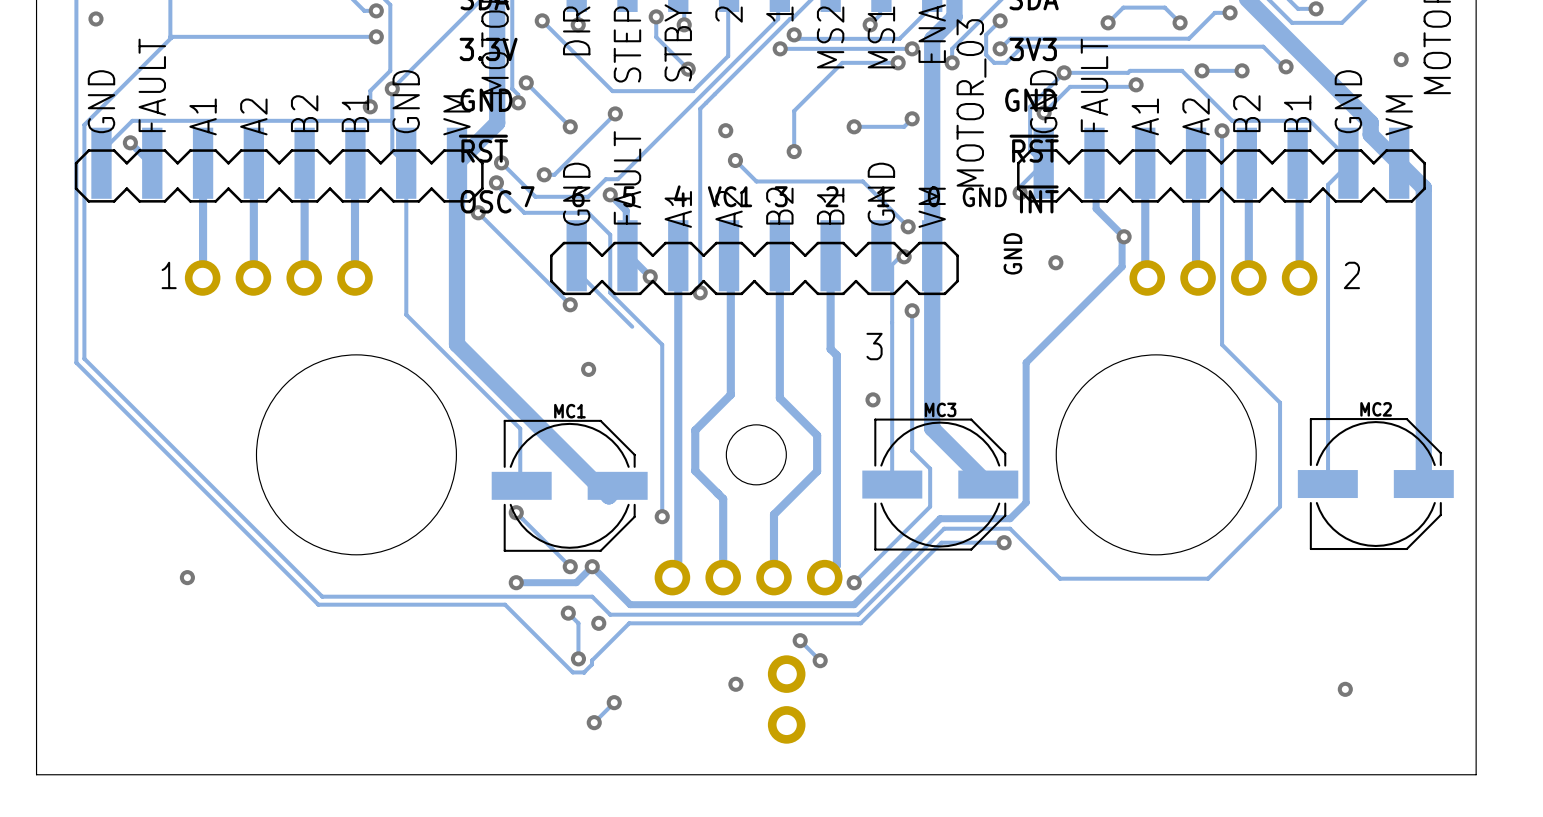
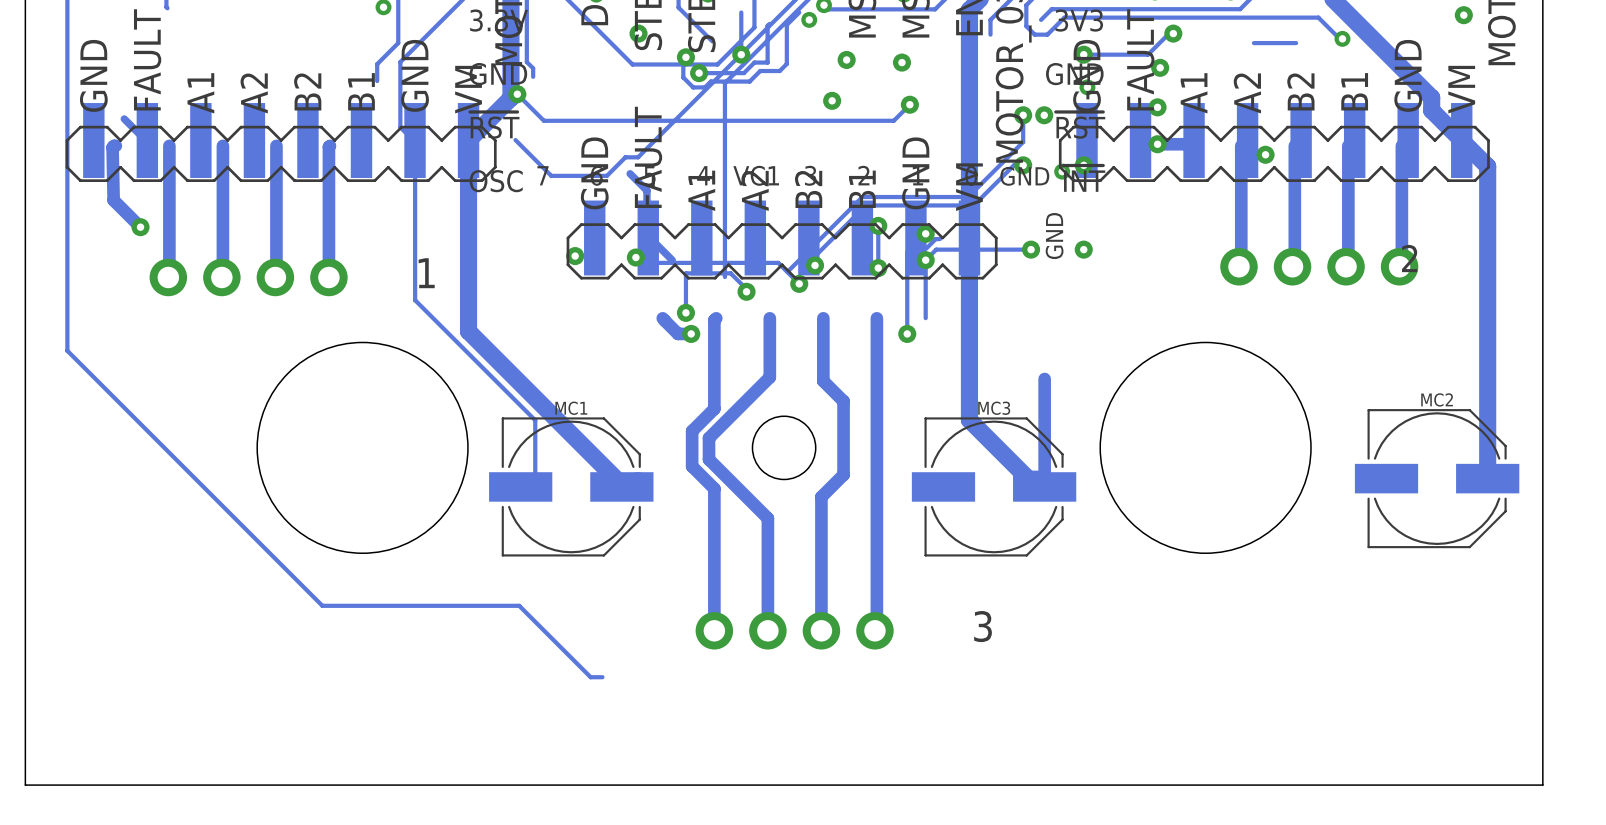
track: (376, 36) (172, 36) (84, 124) (84, 358) (322, 596) (592, 596) (610, 614) (858, 614) (944, 528) (1010, 528) (1060, 578) (1208, 578) (1280, 506) (1280, 402) (1222, 344) (1222, 130) -> none
track: none -> (741, 12) (741, 54)
track: none -> (799, 12) (786, 24) (786, 63) (779, 71) (760, 71) (749, 81) (710, 81) (705, 87) (693, 87) (683, 77) (683, 57) (685, 57)
track: (912, 48) (780, 48) -> none
via: (912, 48) -> none
via: (1000, 48) -> none
track: none -> (769, 23) (767, 25) (767, 62) (754, 62) (743, 73) (699, 73)
via position: (1401, 59) -> (1463, 15)
via: none -> (638, 33)
track: none -> (1173, 33) (1171, 31) (1148, 54) (1083, 54)
via: none -> (1173, 33)
track: (898, 62) (842, 62) (794, 110) (794, 151) -> none
via: (898, 62) -> none
via: (952, 62) -> none
via: (688, 69) -> none
via: (1202, 70) -> none
via: (1242, 70) -> none
via: (1064, 72) -> none
via: none -> (741, 54)
via: none -> (1083, 54)
track: (526, 82) (570, 126) -> none
via: (526, 82) -> none
via: none -> (685, 57)
track: (1136, 84) (1134, 86) (1070, 86) (1044, 112) -> none
via: (1136, 84) -> none
via: none -> (846, 59)
via: (392, 88) -> none
via: none -> (901, 62)
via: none -> (1160, 67)
via: none -> (699, 73)
via: (518, 102) -> none
via: (370, 106) -> none
track: (615, 113) (554, 174) (544, 174) -> none
via: (615, 113) -> none
track: (912, 118) (904, 126) (854, 126) -> none
via: (912, 118) -> none
track: none -> (517, 94) (543, 120) (893, 120) (909, 104)
via: none -> (517, 94)
track: (392, 120) (132, 120) (102, 150) (101, 163) -> none
via: none -> (832, 100)
via: (570, 126) -> none
via: (854, 126) -> none
via: none -> (909, 104)
via: (725, 130) -> none
via: (1222, 130) -> none
via: none -> (1157, 107)
track: none -> (1023, 115) (1023, 142) (968, 197) (862, 197) (787, 272)
via: none -> (1023, 115)
via: none -> (1044, 115)
via: (130, 142) -> none
via: (794, 151) -> none
track: (735, 160) (756, 181) (862, 181) (908, 226) -> none
via: (735, 160) -> none
via: (501, 162) -> none
track: (203, 163) (202, 277) -> none
track: (253, 163) (253, 277) -> none
track: (304, 163) (304, 277) -> none
track: (355, 163) (355, 277) -> none
track: (1094, 163) (1096, 164) (1096, 208) (1124, 236) (1122, 238) (1122, 266) (1026, 362) (1026, 502) (1010, 518) (940, 518) (854, 604) (630, 604) (592, 566) (576, 582) (516, 582) -> none
track: (1145, 163) (1145, 275) (1147, 277) -> none
track: (1196, 163) (1196, 275) (1198, 277) -> none
track: (1246, 163) (1248, 165) (1248, 277) -> none
track: (1297, 163) (1299, 165) (1299, 277) -> none
track: none -> (1157, 144) (1186, 144) (1187, 145)
via: none -> (1157, 144)
track: none -> (115, 145) (112, 147) (113, 200) (140, 227)
track: none -> (169, 145) (168, 277)
track: none -> (222, 145) (221, 277)
track: none -> (276, 145) (275, 277)
track: none -> (329, 145) (328, 277)
track: none -> (1241, 145) (1241, 264) (1238, 266)
track: none -> (1294, 145) (1294, 264) (1292, 266)
track: none -> (1348, 145) (1348, 264) (1346, 266)
track: none -> (1401, 145) (1401, 264) (1399, 266)
via: (544, 174) -> none
via: none -> (1265, 154)
track: (496, 182) (524, 212) (588, 212) (610, 234) (610, 292) (662, 344) (662, 516) -> none
via: (496, 182) -> none
track: none -> (1023, 165) (1013, 165) (973, 205) (865, 205) (815, 256) (815, 265)
via: none -> (1023, 165)
via: none -> (1083, 165)
track: (1020, 192) (1020, 186) (1043, 163) (1030, 150) (1030, 106) (1064, 72) (1182, 70) (1232, 120) (1310, 120) (1348, 158) (1348, 163) (1328, 184) (1327, 484) -> none
via: (610, 194) -> none
track: (478, 212) (570, 304) -> none
via: (478, 212) -> none
via: (908, 226) -> none
via: (1124, 236) -> none
track: none -> (878, 225) (878, 268)
via: none -> (878, 225)
via: none -> (140, 227)
track: none -> (925, 233) (907, 252) (907, 333)
track: (576, 255) (578, 272) (632, 326) -> none
track: (678, 255) (678, 571) (672, 577) -> none
track: (729, 255) (730, 267) (730, 394) (695, 430) (695, 470) (723, 498) (723, 577) -> none
track: (779, 255) (779, 398) (817, 435) (817, 471) (773, 514) (773, 577) -> none
track: (830, 255) (830, 349) (836, 355) (836, 565) (824, 577) -> none
track: (881, 255) (892, 266) (892, 484) (890, 482) -> none
via position: (904, 256) -> (925, 233)
via position: (1055, 262) -> (1083, 249)
track: none -> (1031, 249) (936, 249) (925, 260) (925, 318)
via: none -> (1031, 249)
via: none -> (575, 256)
track: none -> (635, 257) (641, 262) (778, 262) (799, 283)
via: none -> (635, 257)
text position: 1 (169, 275) -> 1 (426, 273)
via: (650, 276) -> none
via: none -> (925, 260)
part position: (278, 277) -> (248, 277)
part position: (1223, 277) -> (1319, 266)
via: none -> (815, 265)
via: none -> (878, 268)
via: (700, 292) -> none
via: none -> (799, 283)
via: (570, 304) -> none
track: none -> (746, 291) (746, 289) (730, 273) (685, 273) (685, 312)
via: none -> (746, 291)
track: (912, 310) (912, 450) (930, 468) (930, 506) (854, 582) -> none
via: (912, 310) -> none
via: none -> (685, 312)
track: none -> (662, 318) (678, 333) (691, 333)
track: none -> (716, 318) (714, 320) (714, 408) (692, 431) (692, 466) (714, 488) (714, 630)
track: none -> (769, 318) (769, 377) (709, 438) (709, 459) (767, 518) (767, 630)
track: none -> (823, 318) (823, 381) (843, 401) (843, 474) (821, 496) (821, 630)
track: none -> (876, 318) (876, 628) (874, 630)
via: none -> (691, 333)
via: none -> (907, 333)
text position: 3 (874, 346) -> 3 (983, 626)
via: (588, 369) -> none
track: none -> (1044, 378) (1044, 486)
via: (873, 399) -> none
MC3 position: (940, 484) -> (994, 486)
MC1 position: (569, 485) -> (571, 486)
track: (516, 512) (570, 566) -> none
via: (516, 512) -> none
via: (662, 516) -> none
track: (1004, 542) (941, 542) (860, 623) (629, 623) (592, 660) (592, 664) (584, 672) -> none
via: (1004, 542) -> none
via: (570, 566) -> none
via: (592, 566) -> none
via: (187, 577) -> none
part position: (748, 577) -> (794, 630)
via: (516, 582) -> none
via: (854, 582) -> none
track: (568, 613) (578, 623) (578, 658) -> none
via: (568, 613) -> none
via: (598, 623) -> none
track: (800, 640) (820, 660) -> none
via: (800, 640) -> none
via: (578, 658) -> none
via: (820, 660) -> none
via: (735, 684) -> none
via: (1345, 689) -> none
part: (786, 699) -> none
track: (614, 702) (594, 722) -> none
via: (614, 702) -> none
via: (594, 722) -> none

